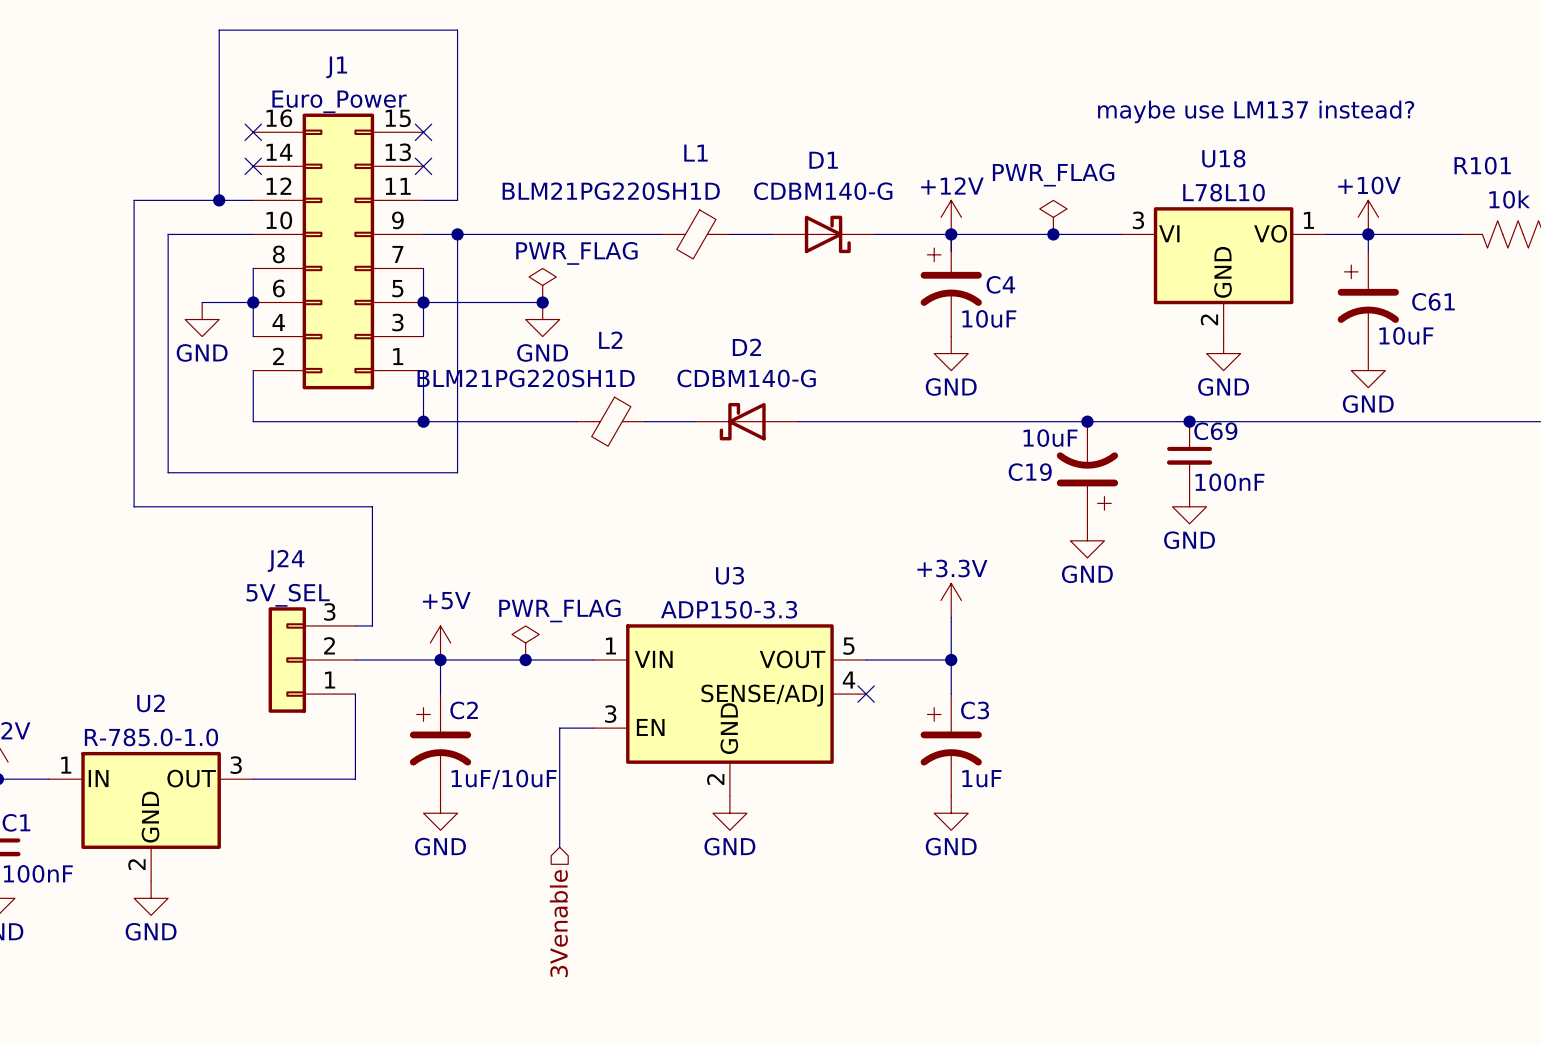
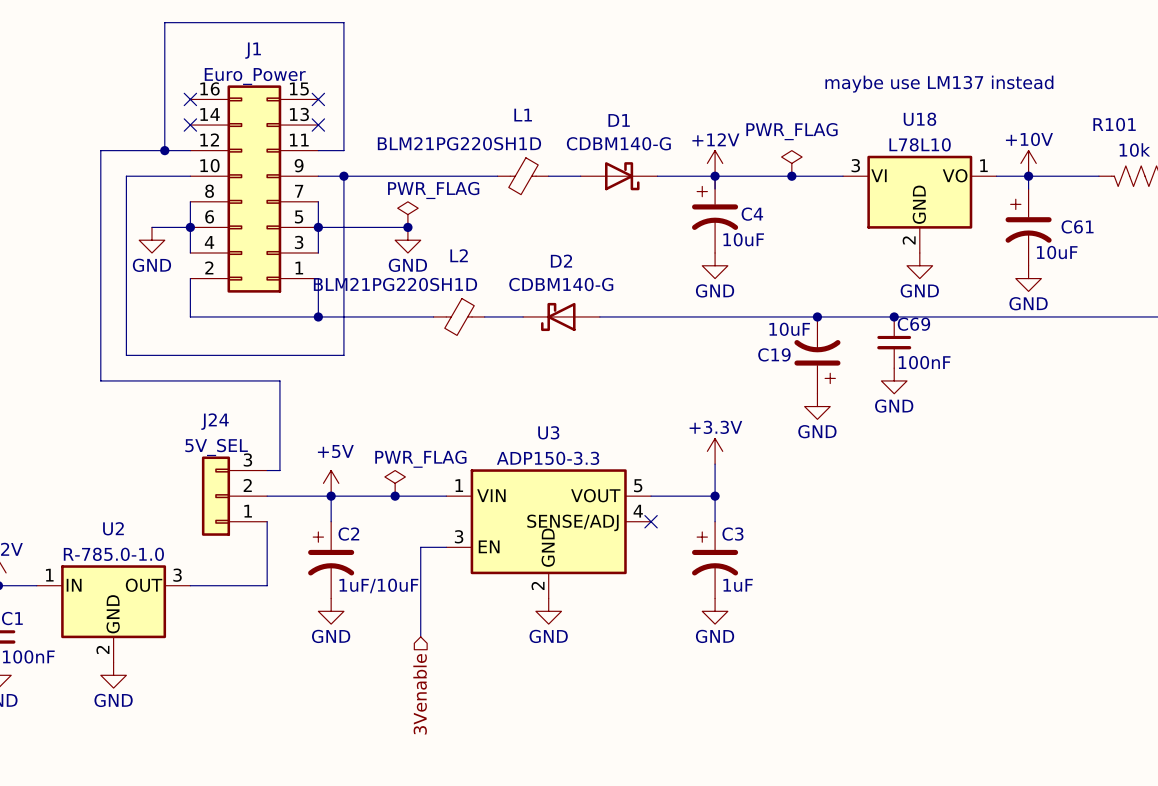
text: maybe use LM137 instead? (1256, 111) -> maybe use LM137 instead (939, 84)

